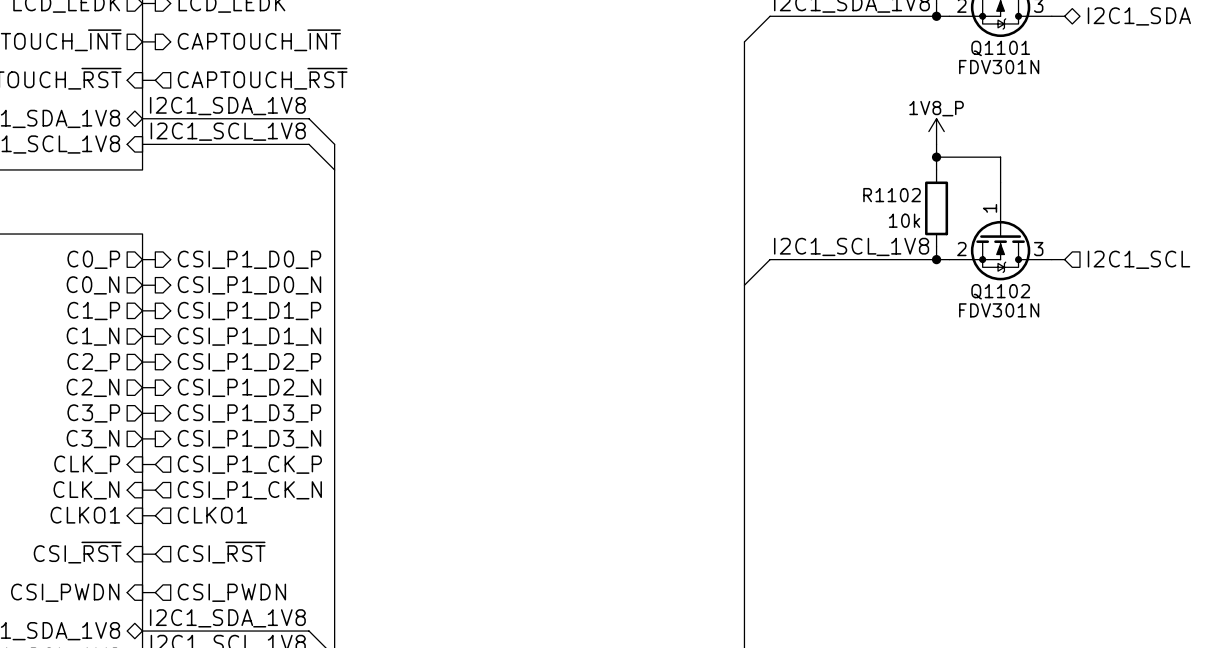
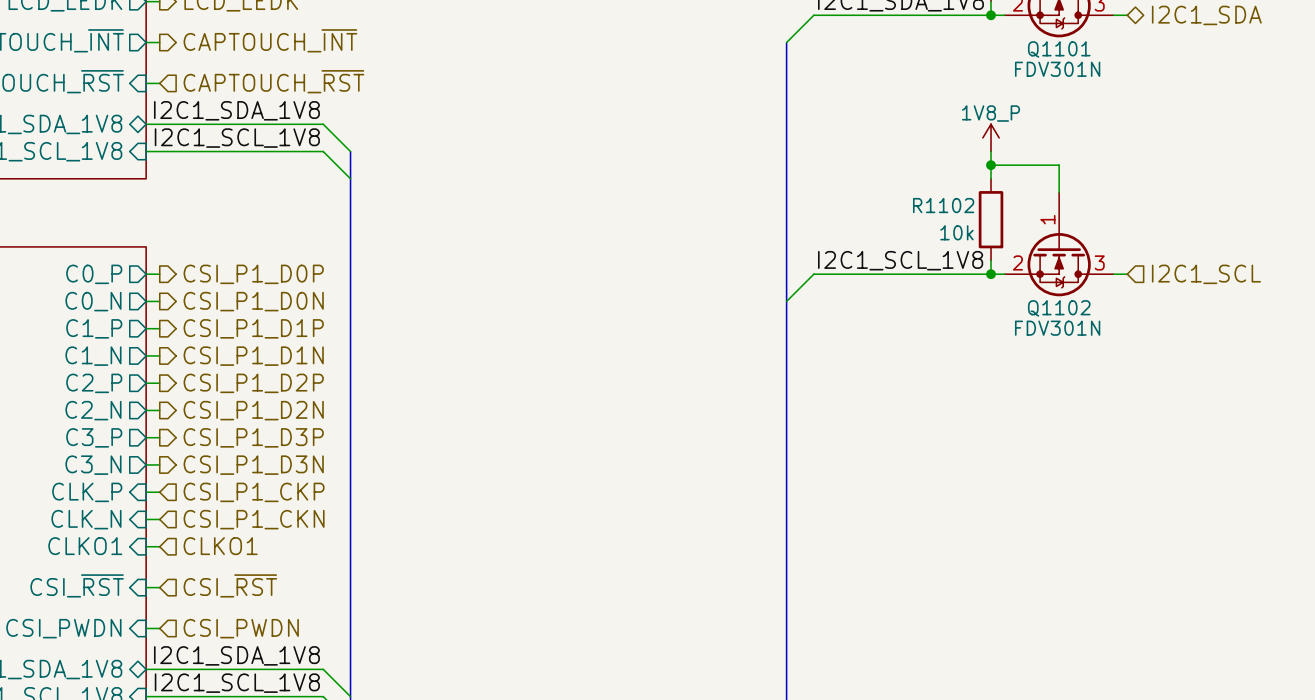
hierarchical label: CSI_P1_D0_P (249, 259) -> CSI_P1_D0P (253, 274)
hierarchical label: CSI_P1_D0_N (249, 285) -> CSI_P1_D0N (253, 301)
hierarchical label: CSI_P1_D1_P (249, 311) -> CSI_P1_D1P (253, 328)
hierarchical label: CSI_P1_D1_N (249, 336) -> CSI_P1_D1N (253, 356)
hierarchical label: CSI_P1_D2_P (249, 362) -> CSI_P1_D2P (253, 383)
hierarchical label: CSI_P1_D2_N (249, 387) -> CSI_P1_D2N (253, 410)
hierarchical label: CSI_P1_D3_P (249, 413) -> CSI_P1_D3P (253, 437)
hierarchical label: CSI_P1_D3_N (249, 439) -> CSI_P1_D3N (253, 465)
hierarchical label: CSI_P1_CK_P (249, 464) -> CSI_P1_CKP (254, 492)
hierarchical label: CSI_P1_CK_N (249, 490) -> CSI_P1_CKN (254, 519)

